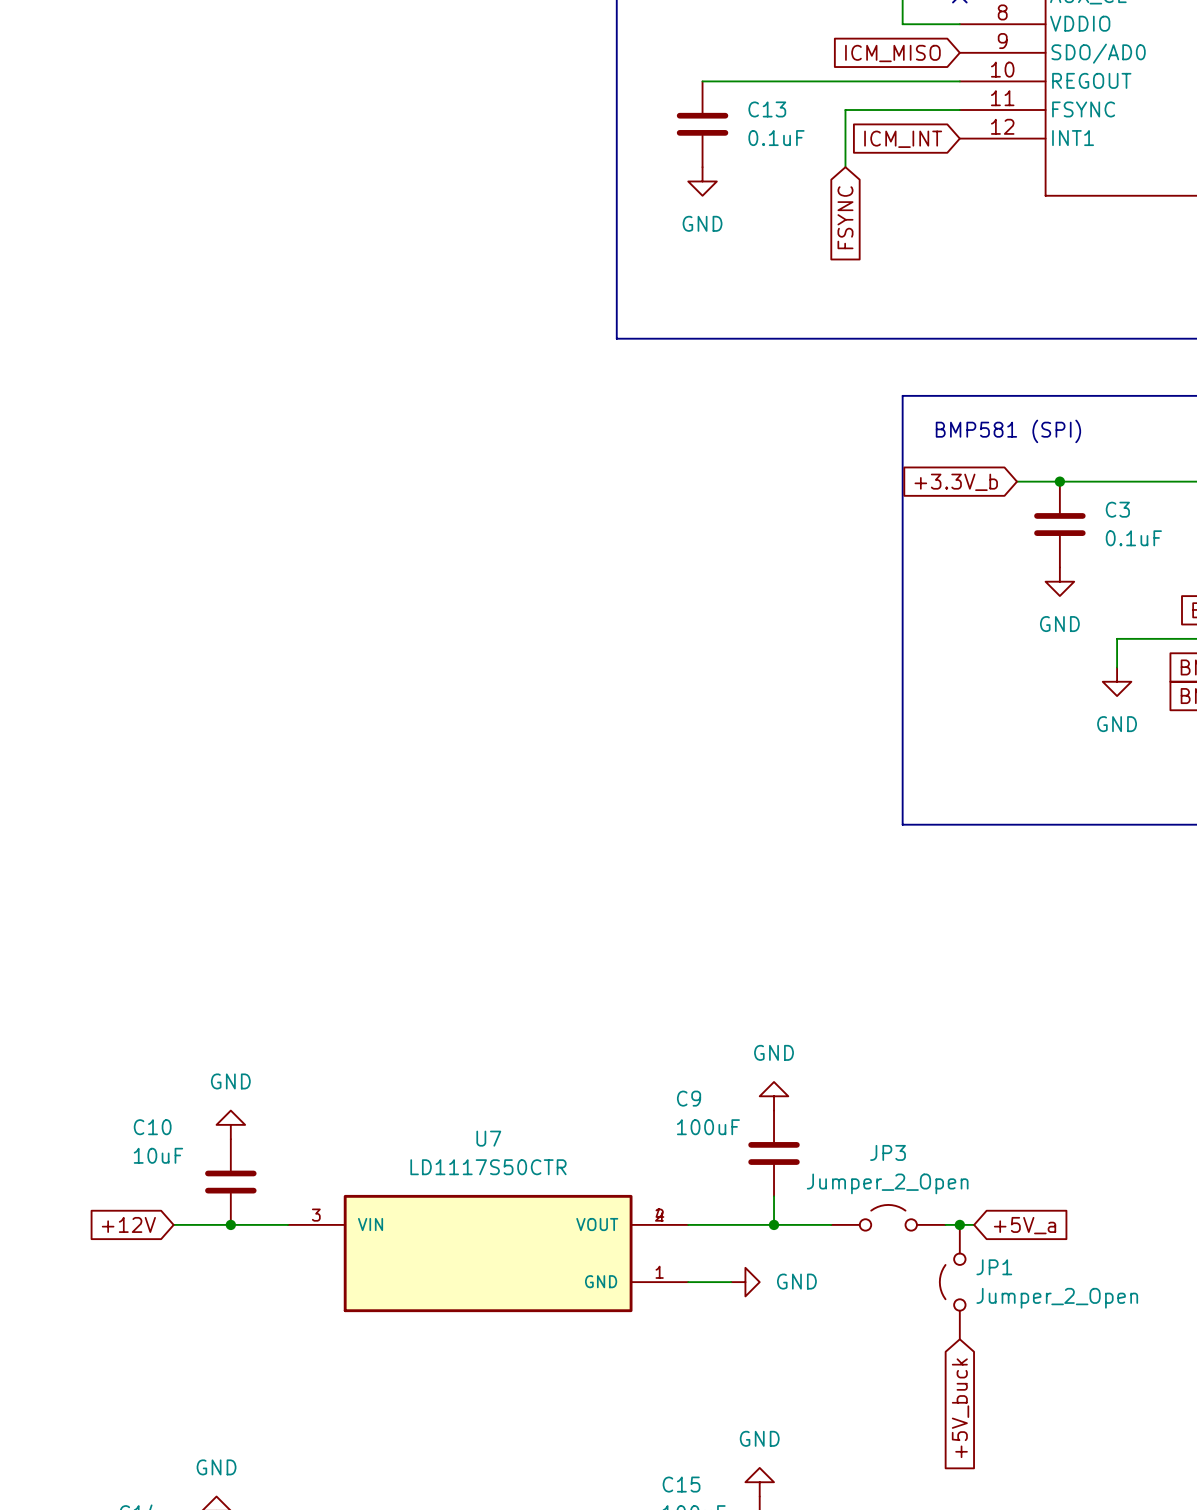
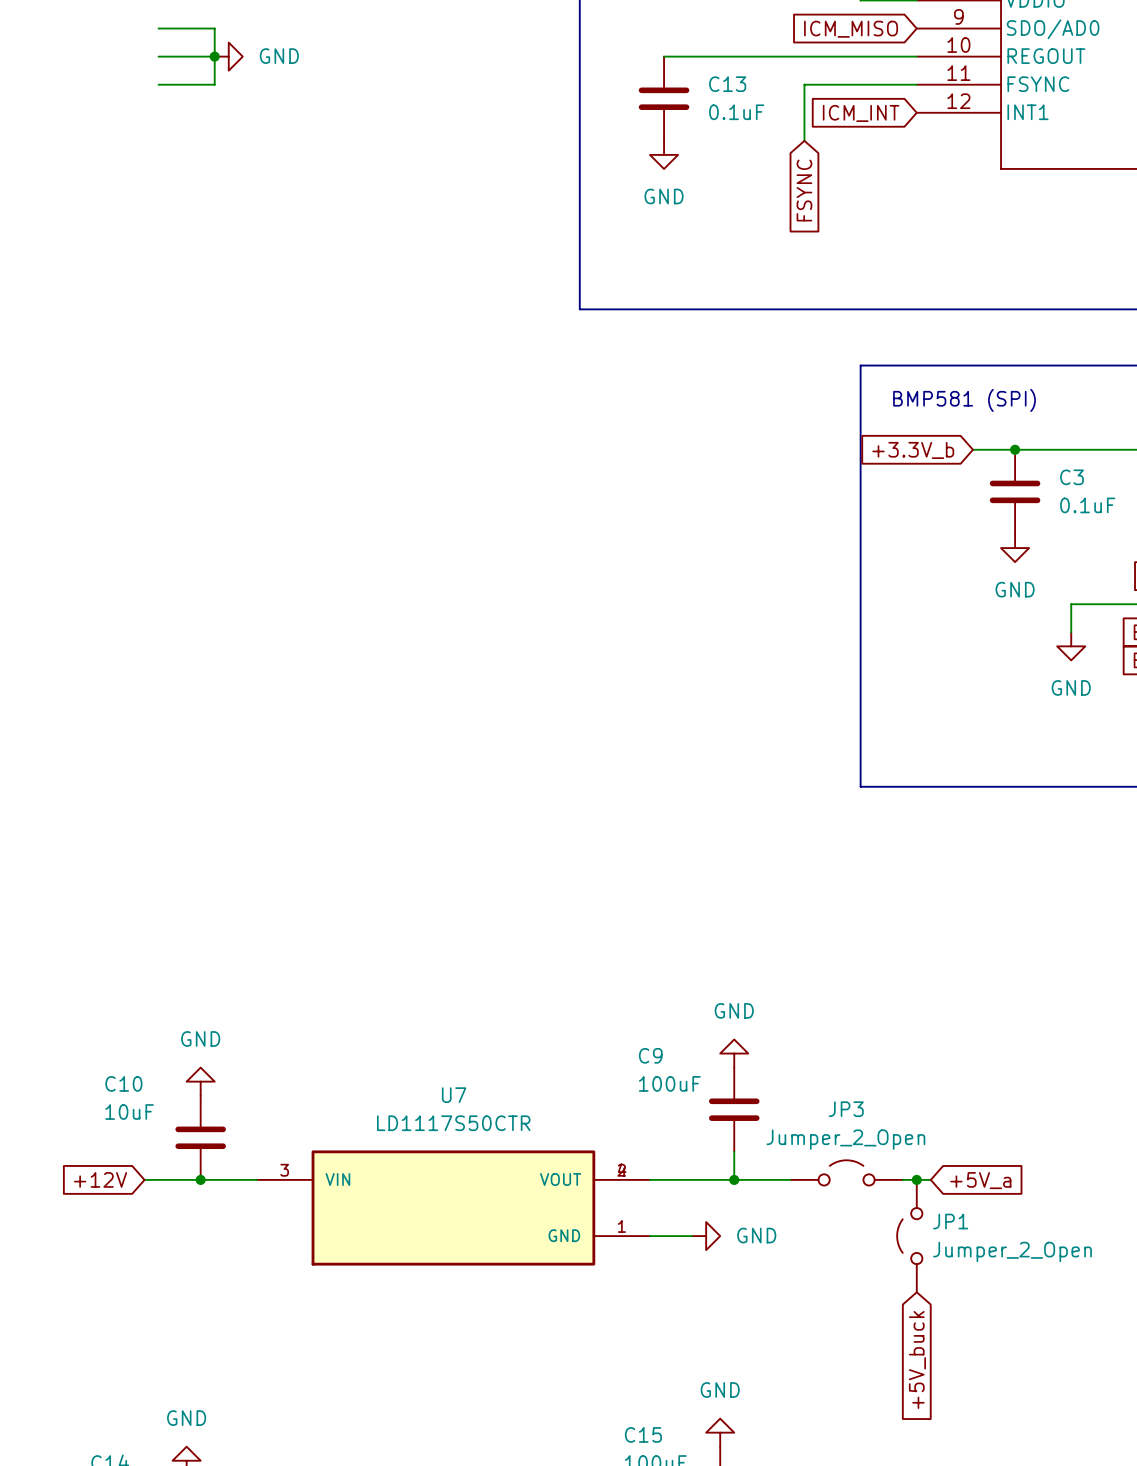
wire: none -> (158, 28) (214, 28) (214, 84) (158, 84)
wire: none -> (158, 56) (214, 56)
junction: none -> (214, 56)
power symbol: none -> GND (228, 56)

